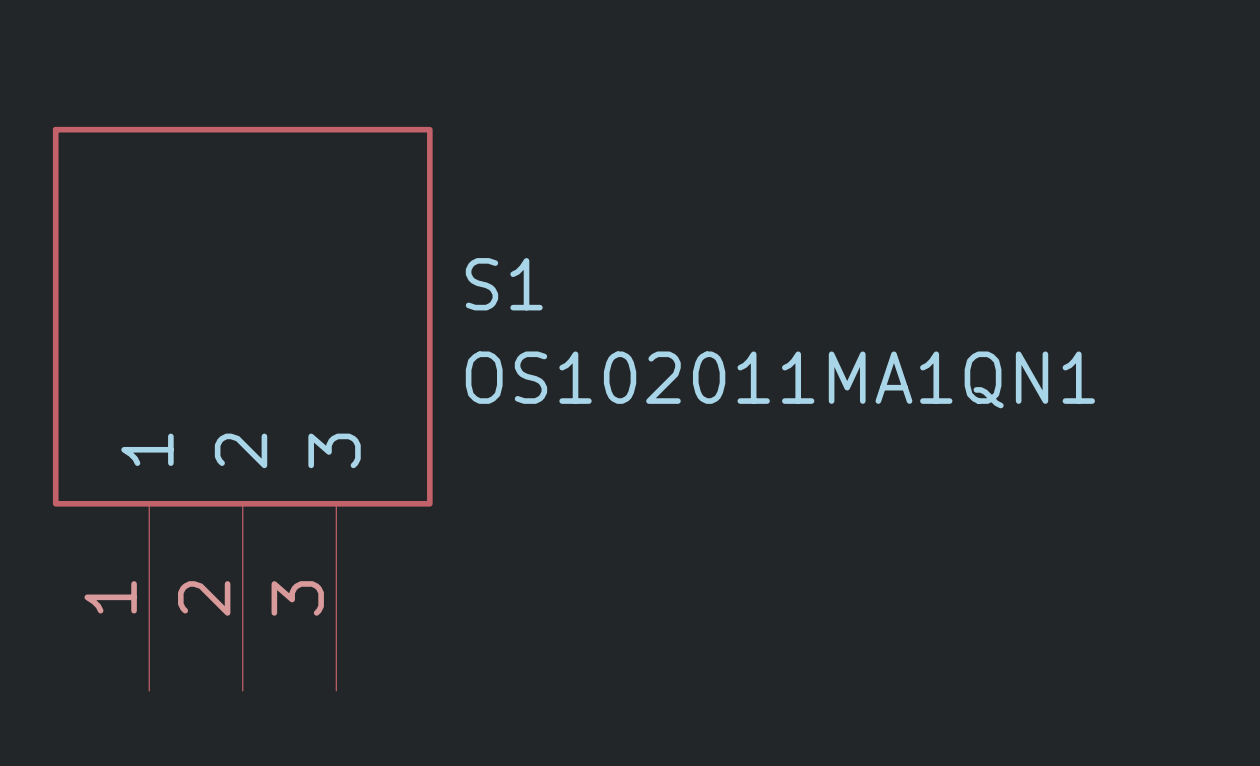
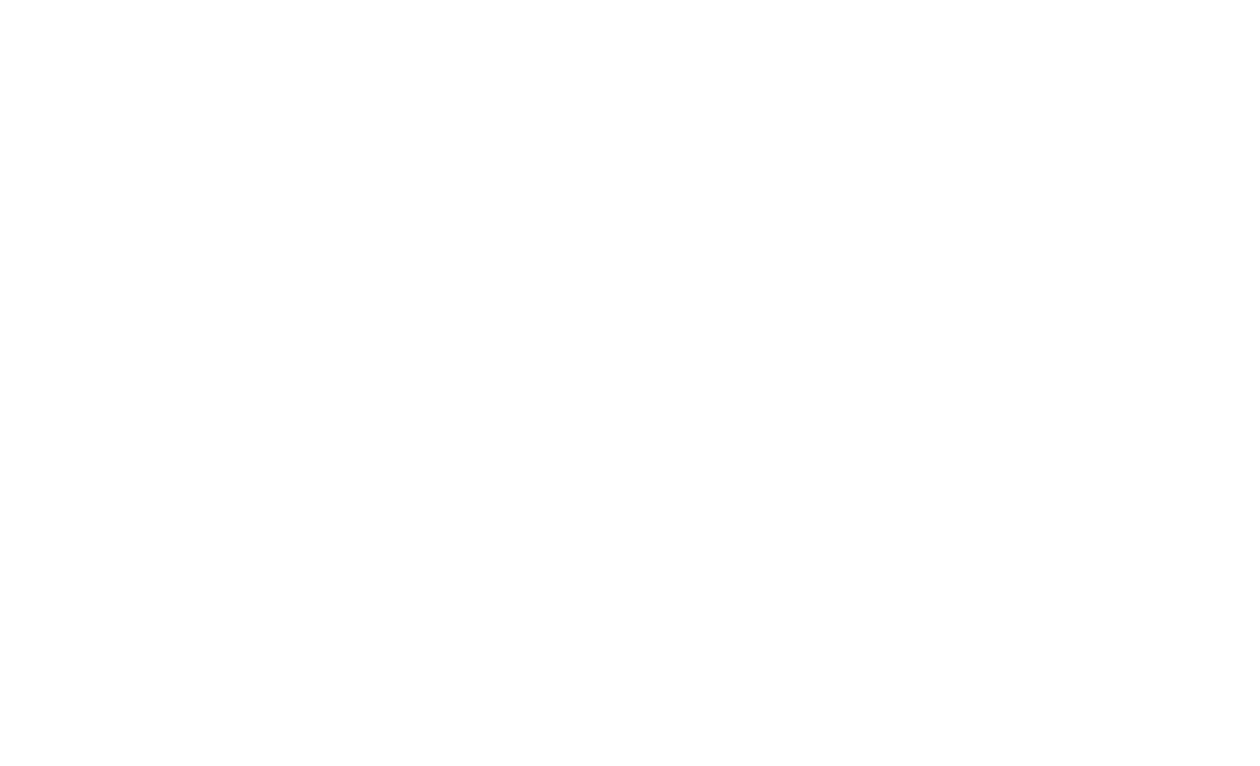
S1: OS102011MA1QN1 (242, 408) -> none

